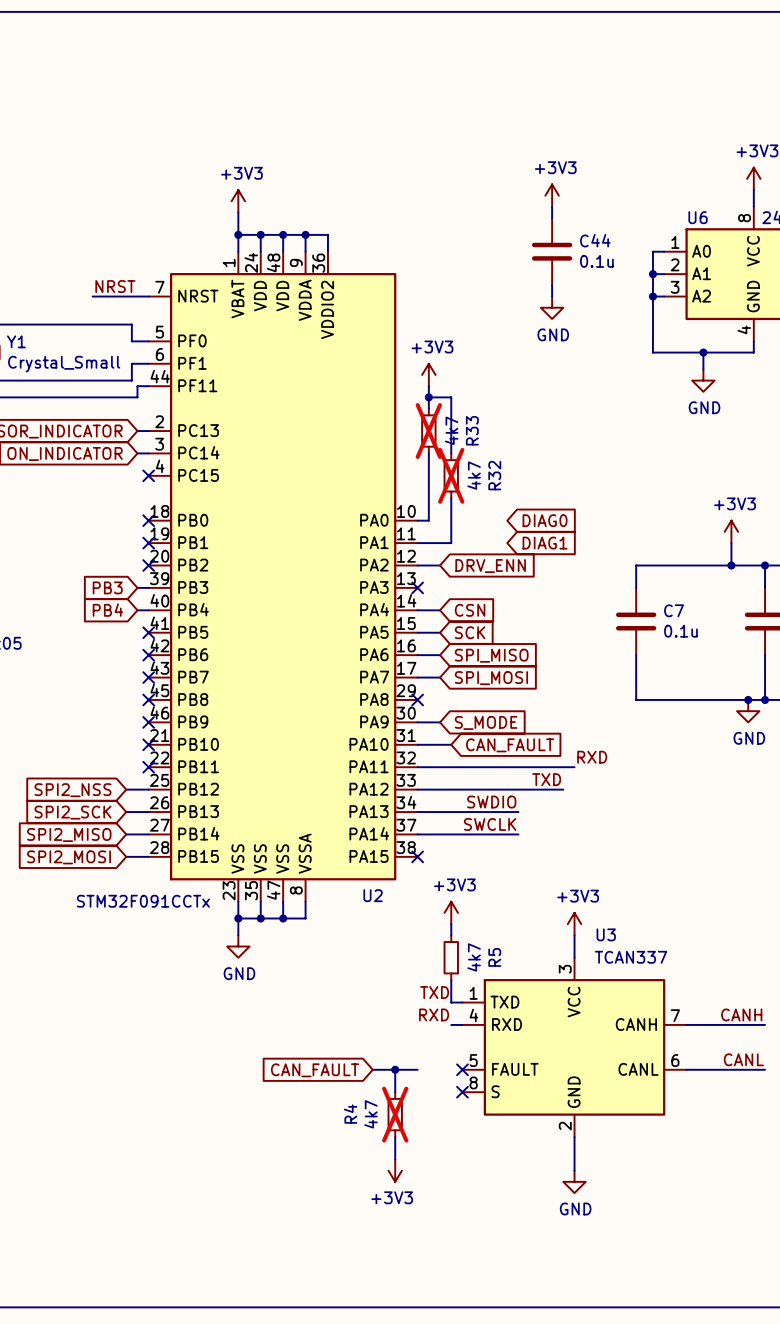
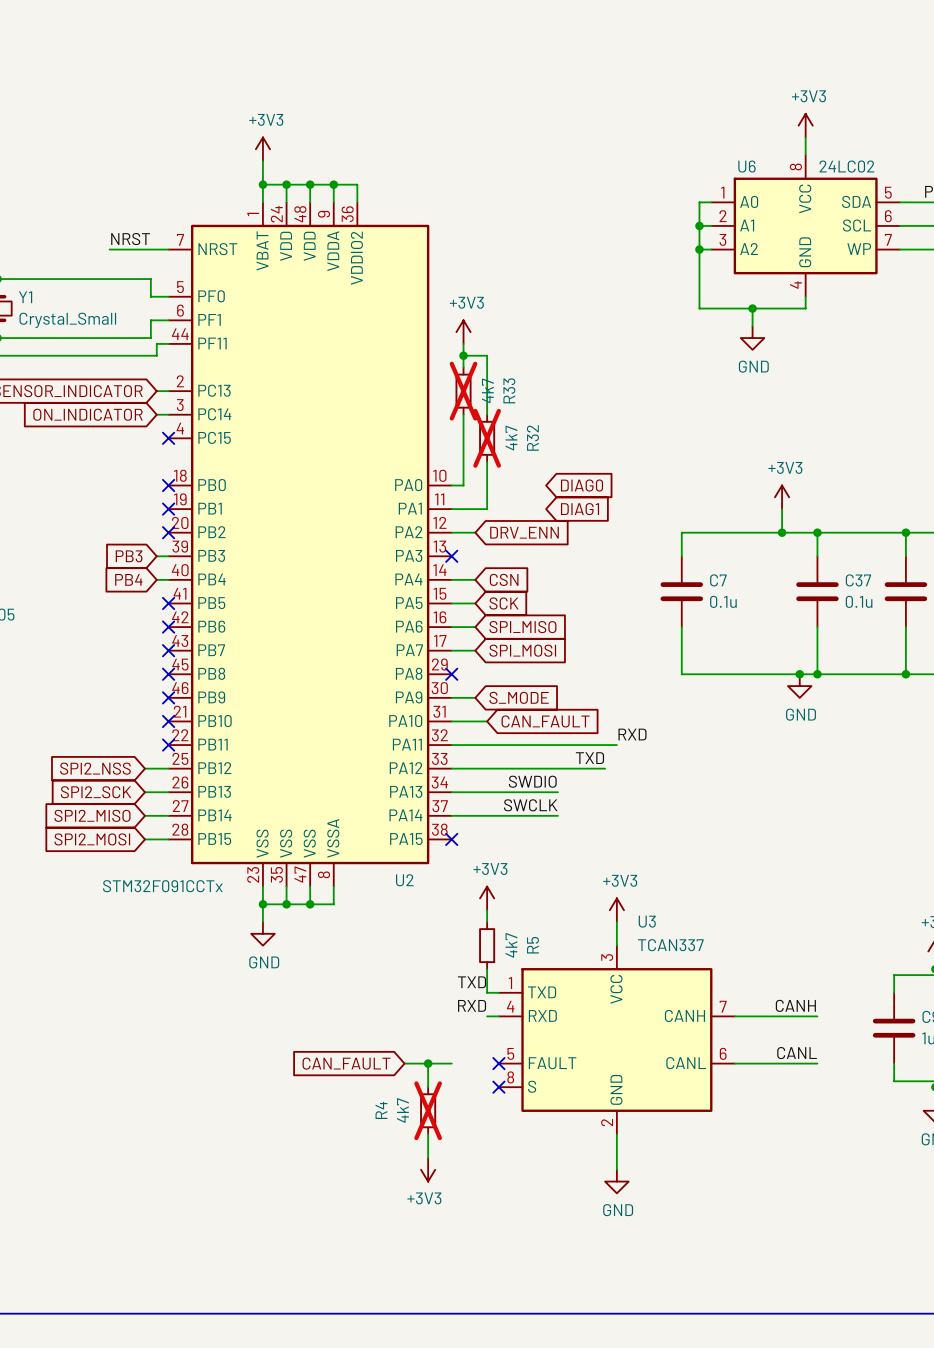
power symbol: +3V3 (552, 195) -> none
wire: (552, 206) (552, 218) -> none
C44: 0.1u (552, 251) -> none
wire: (552, 285) (552, 296) -> none
power symbol: GND (552, 307) -> none

